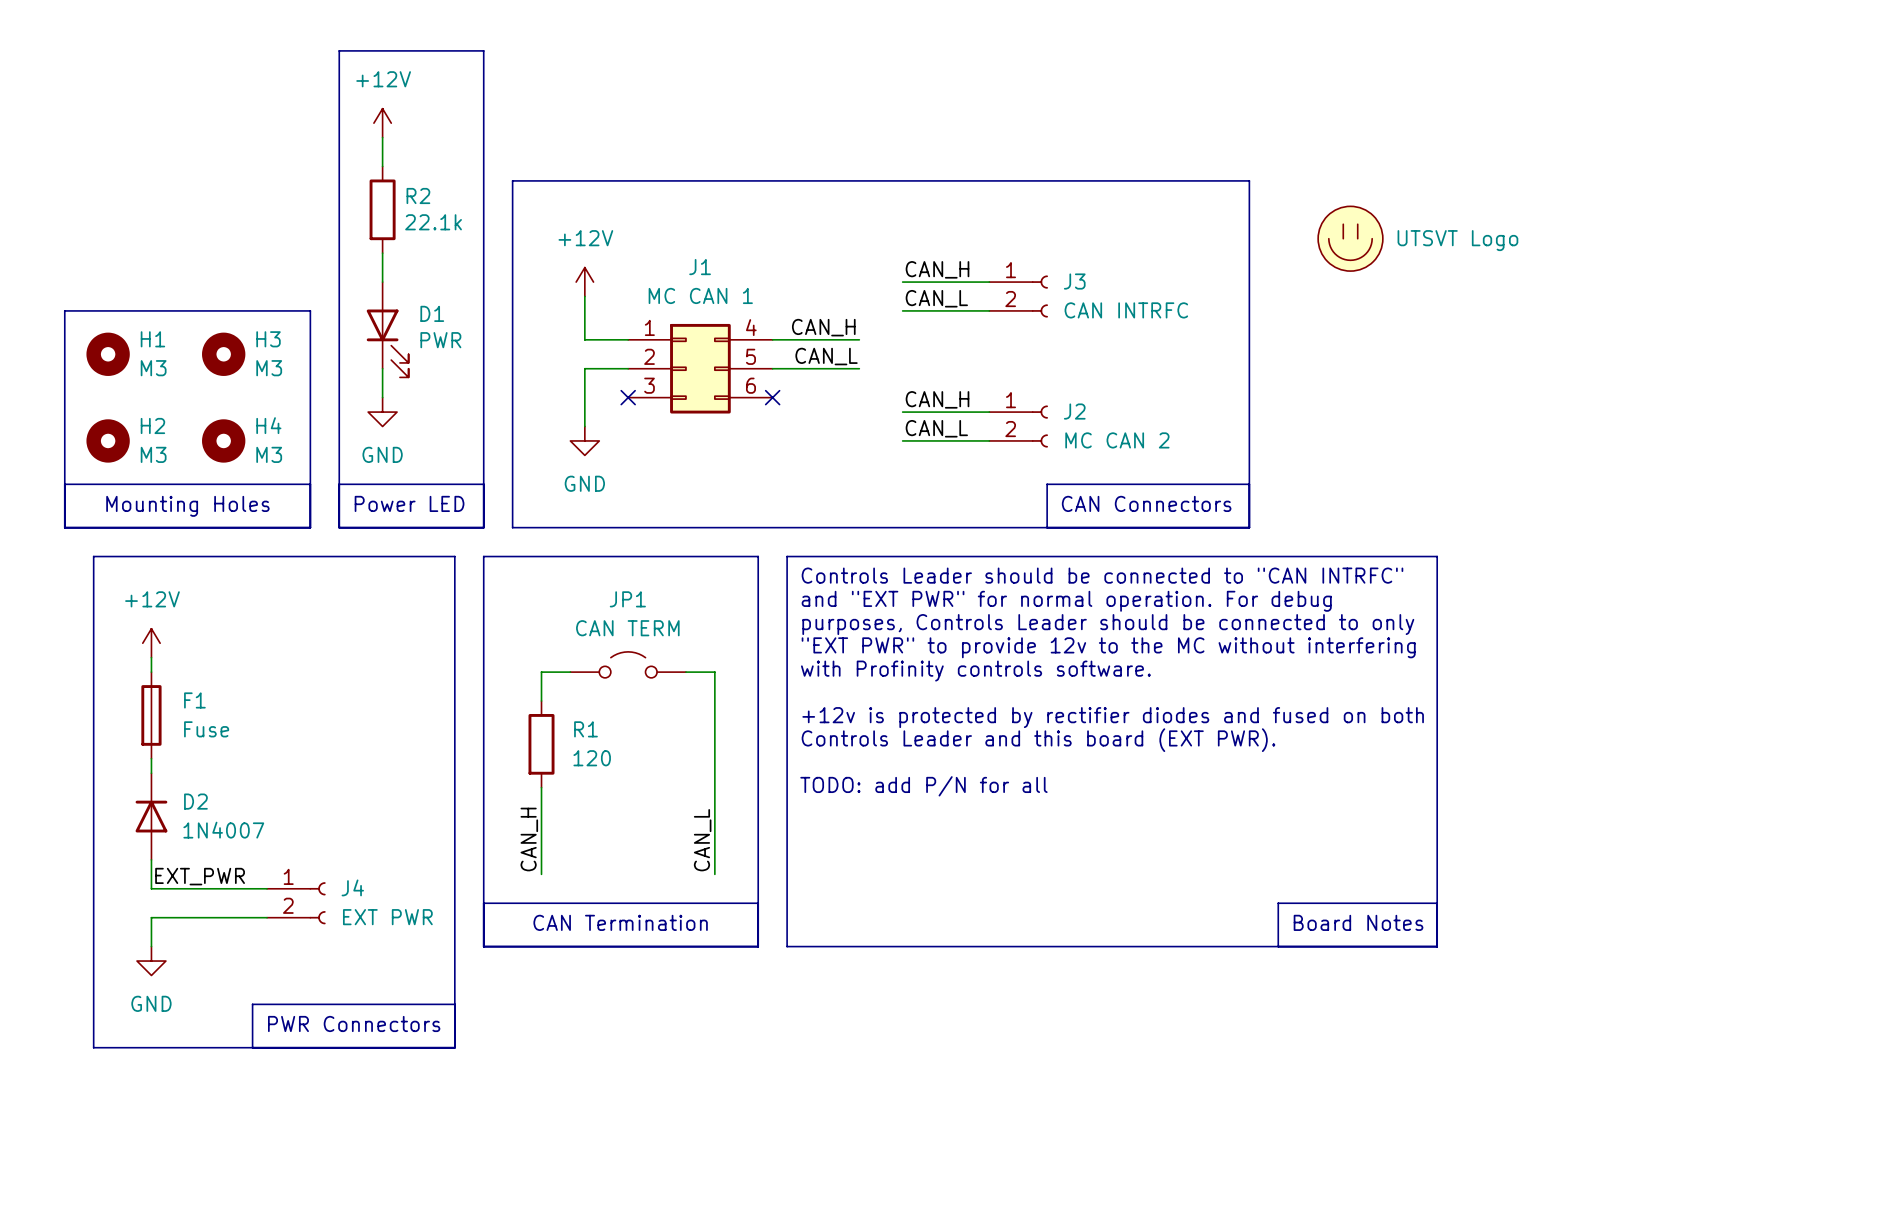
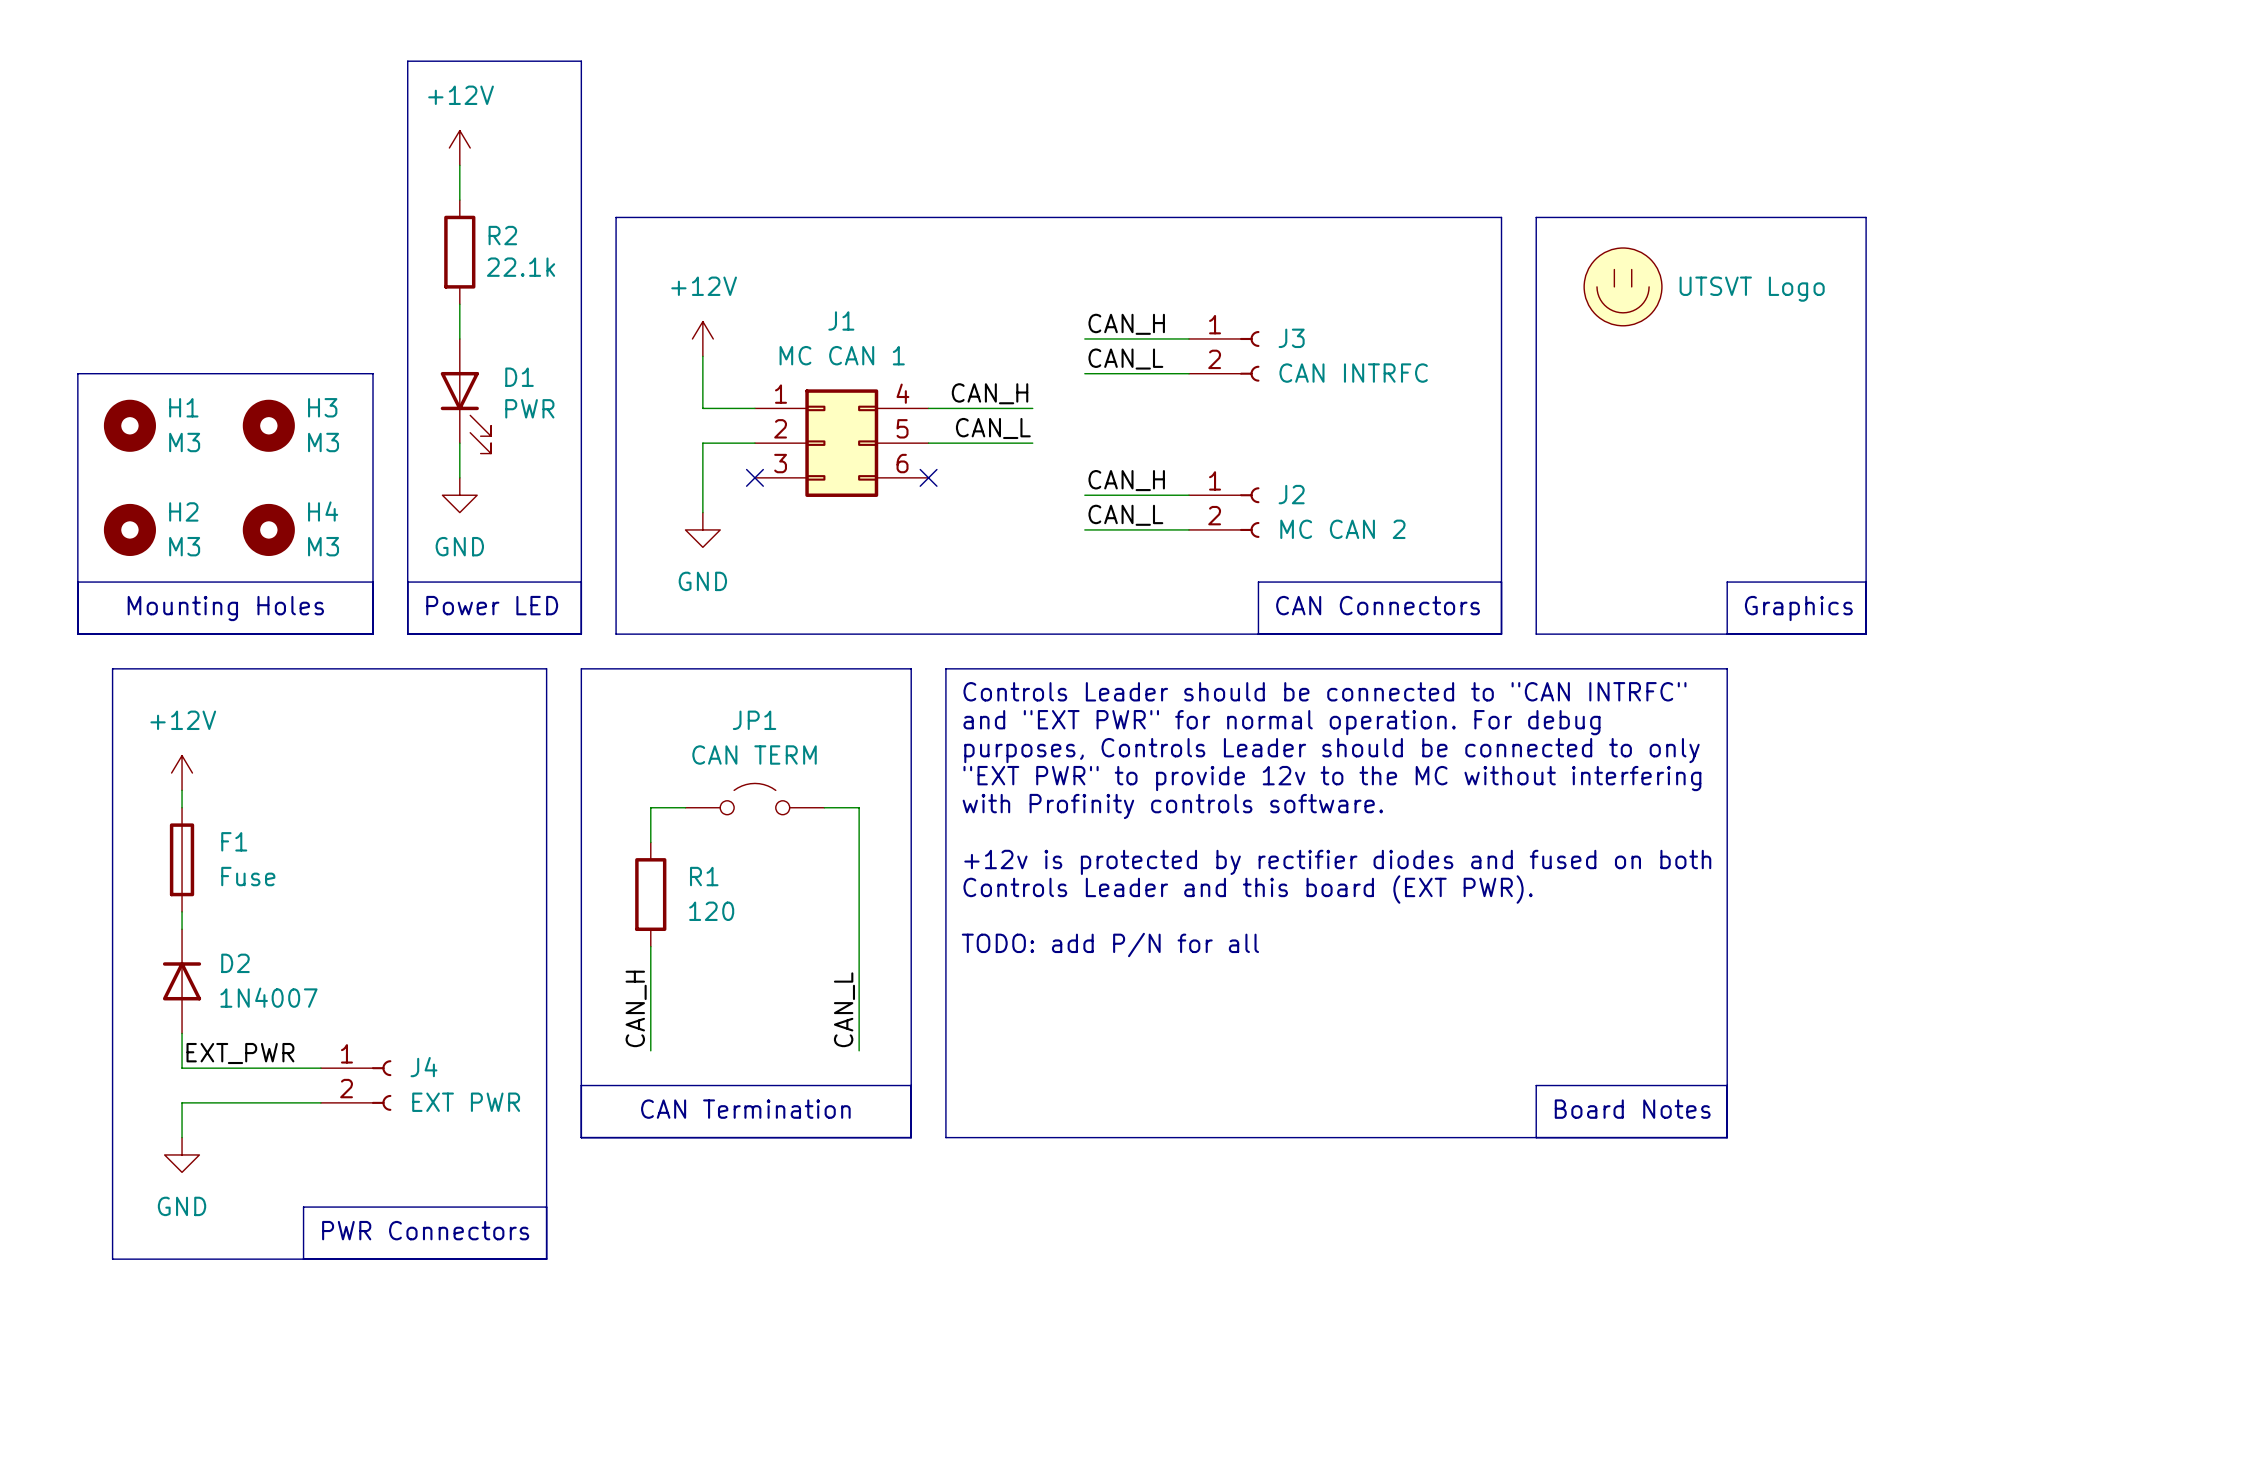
line: none -> (1536, 217) (1866, 217) (1866, 634) (1536, 634) (1536, 217)
line: none -> (1866, 582) (1727, 582) (1727, 634)
text: none -> Graphics (1798, 608)

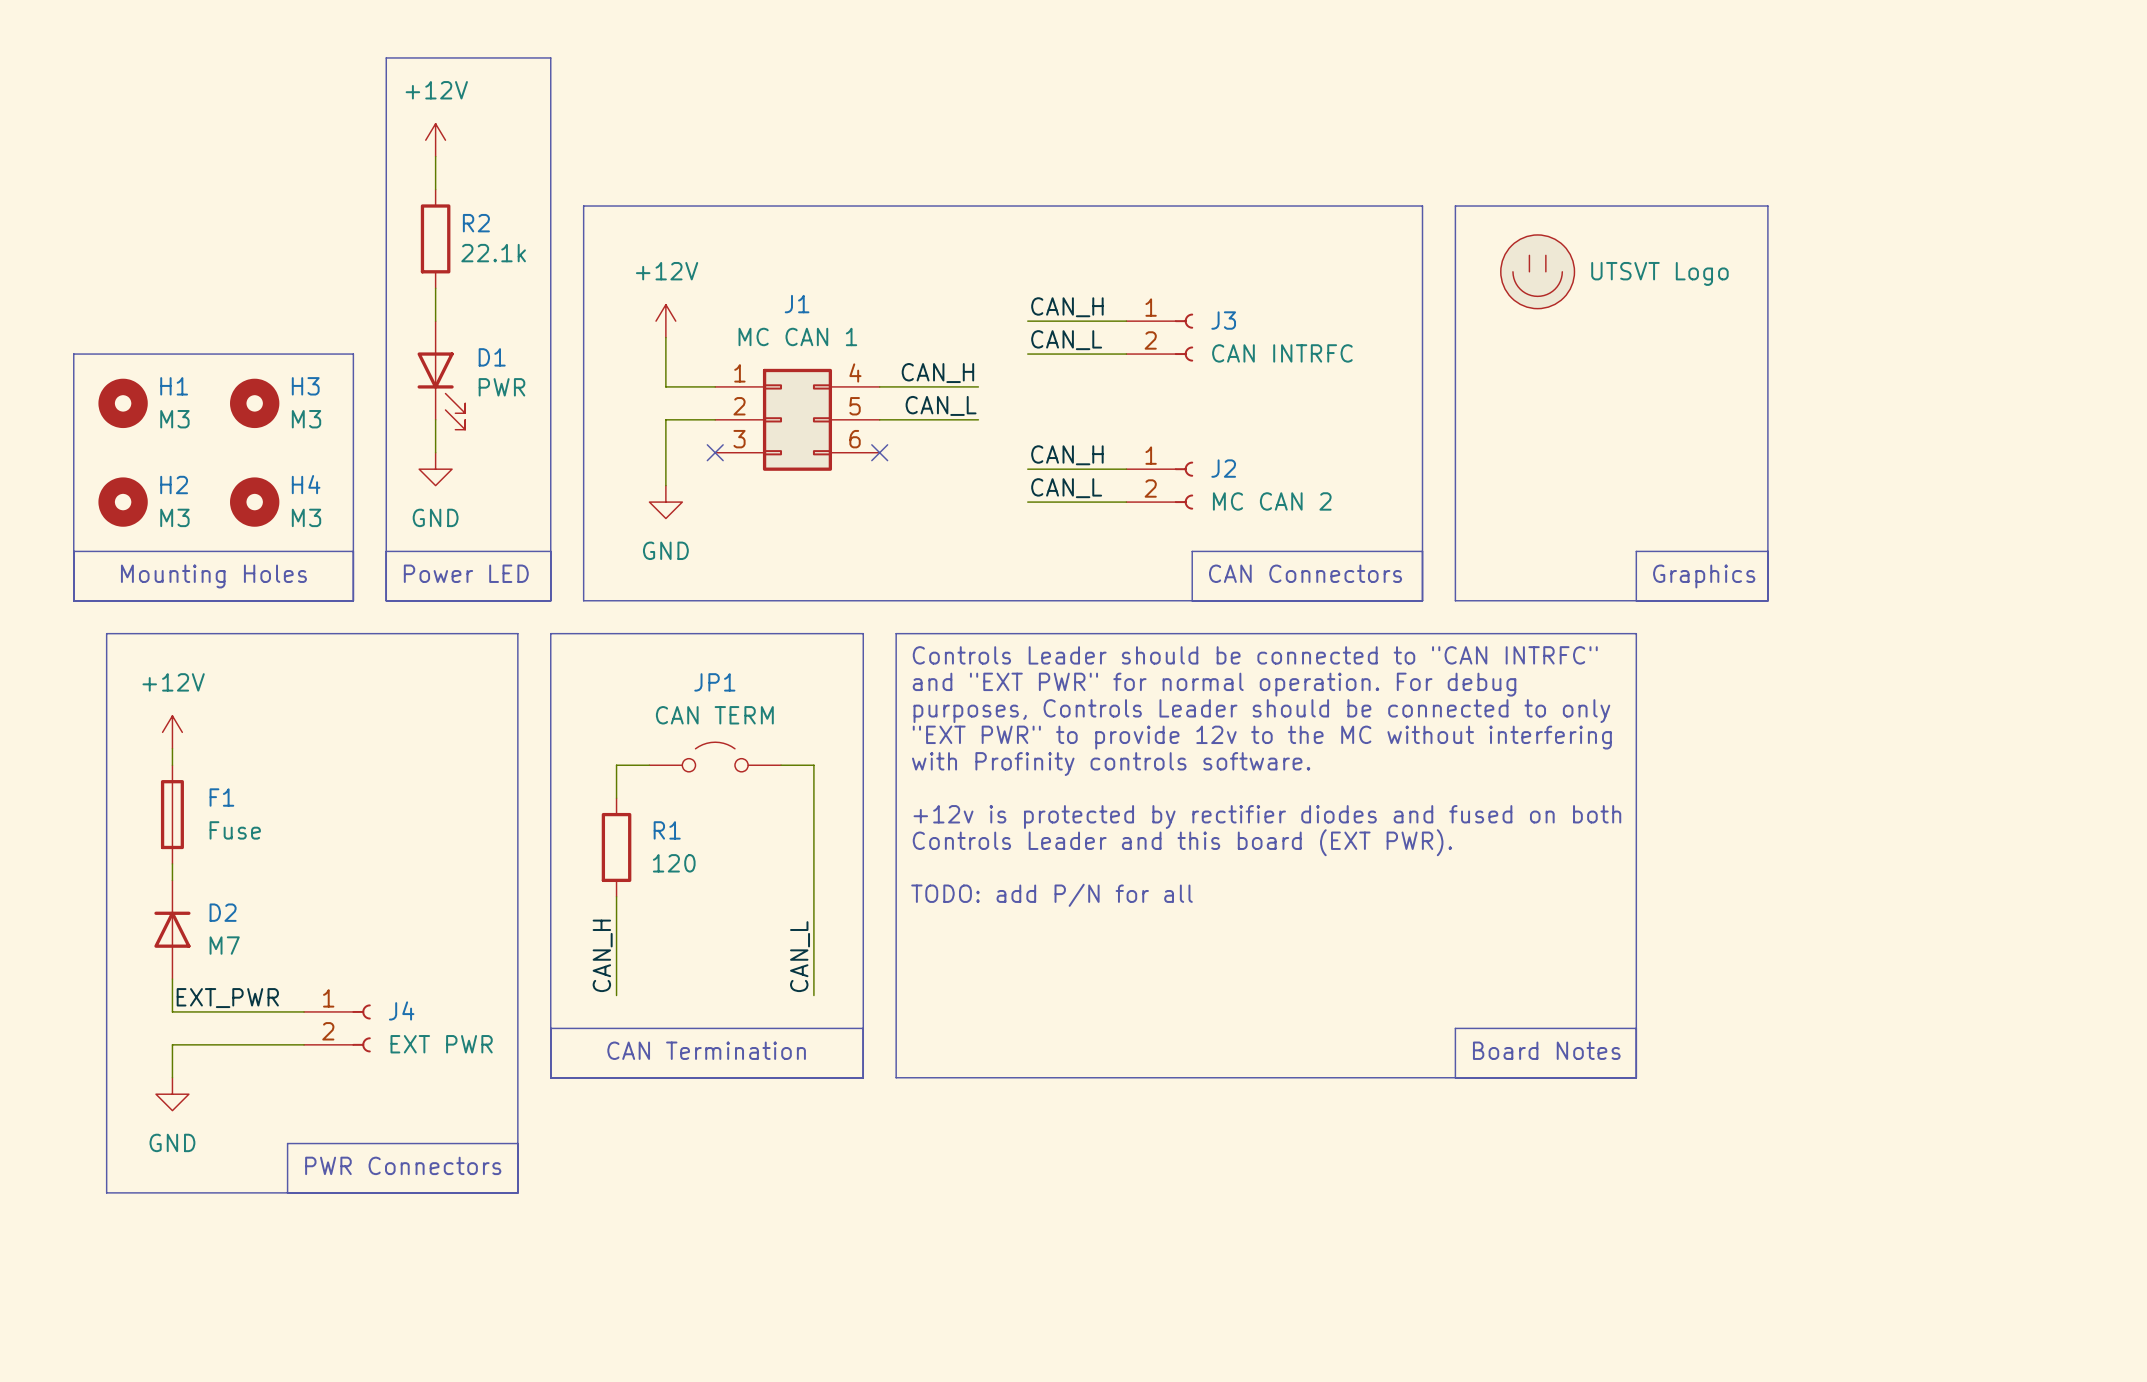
D2 value: 1N4007 (268, 997) -> M7 (224, 945)

